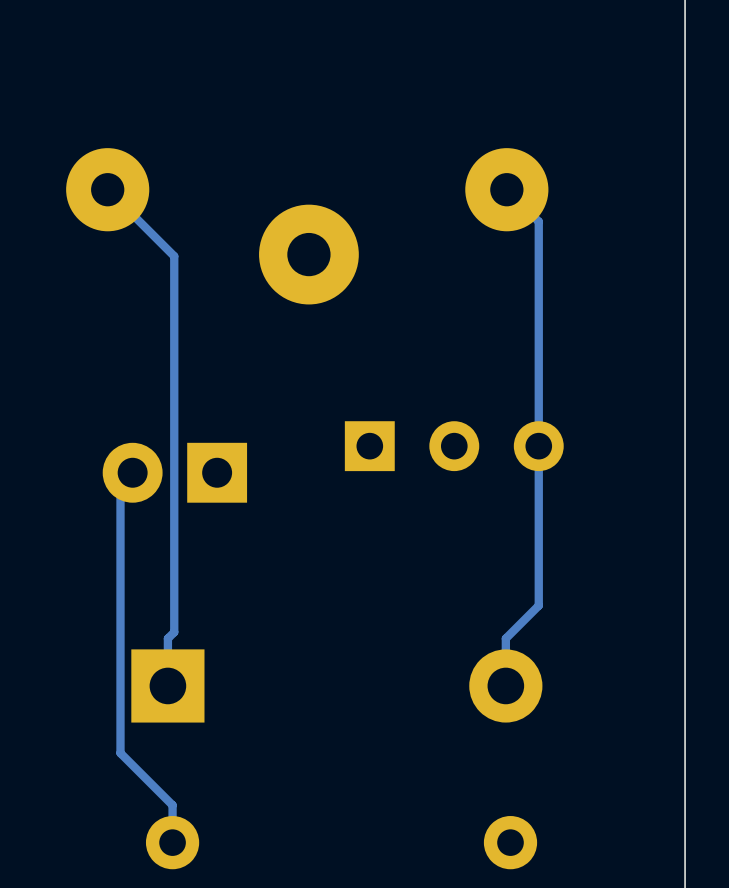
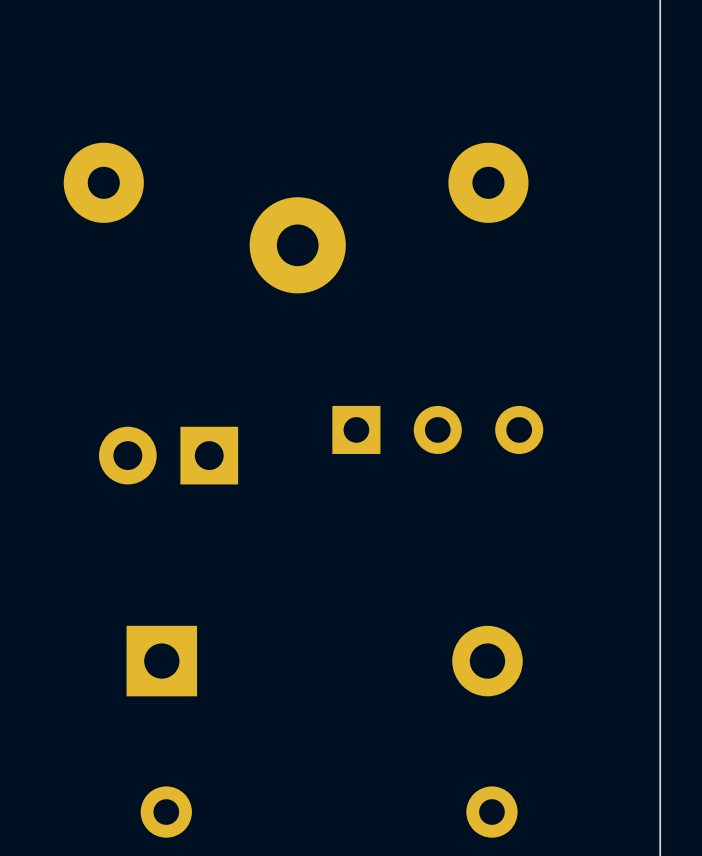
track: (107, 189) (174, 256) (174, 632) (167, 638) (167, 685) -> none
track: (506, 189) (538, 221) (538, 605) (505, 638) (505, 685) -> none
track: (132, 472) (120, 484) (120, 753) (172, 805) (172, 842) -> none

